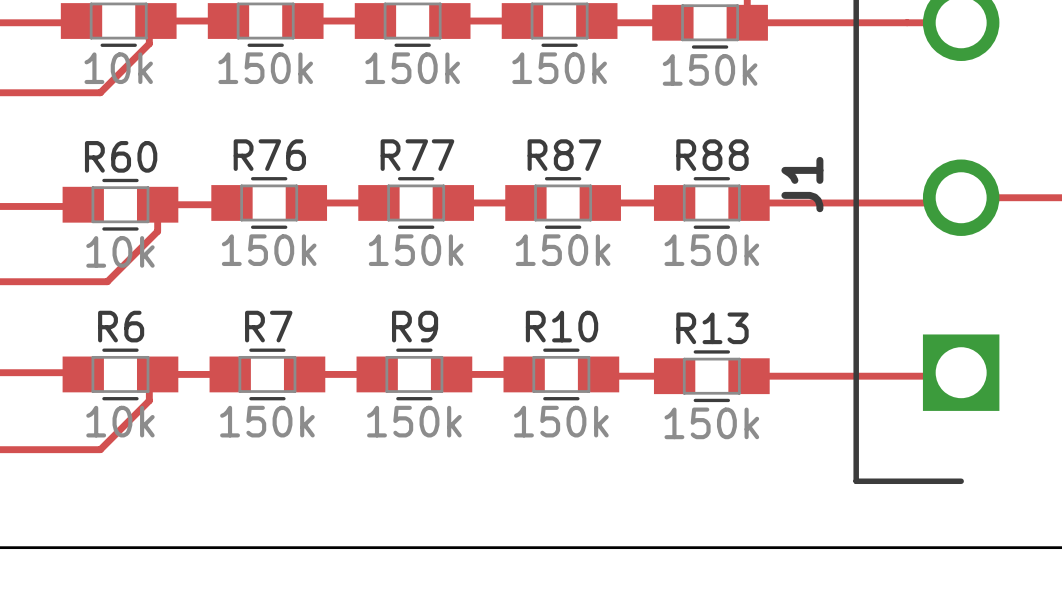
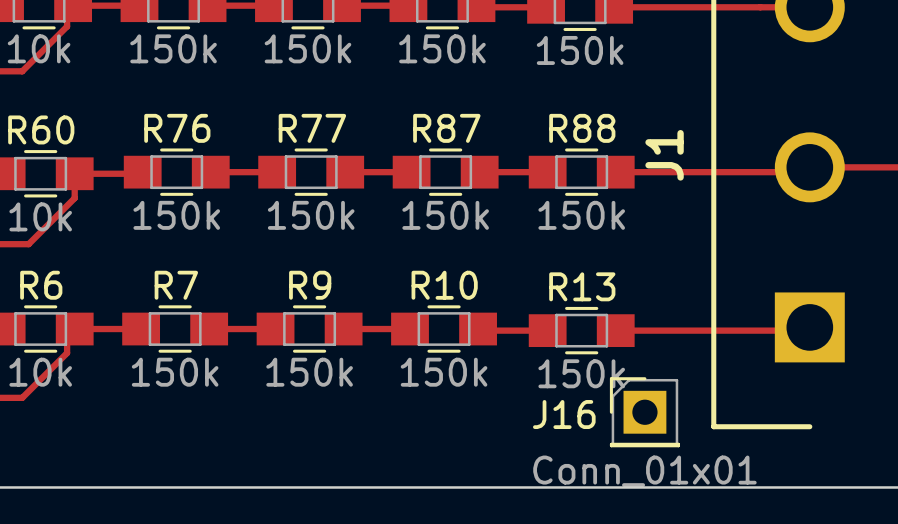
J16: none -> Conn_01x01 (644, 412)

